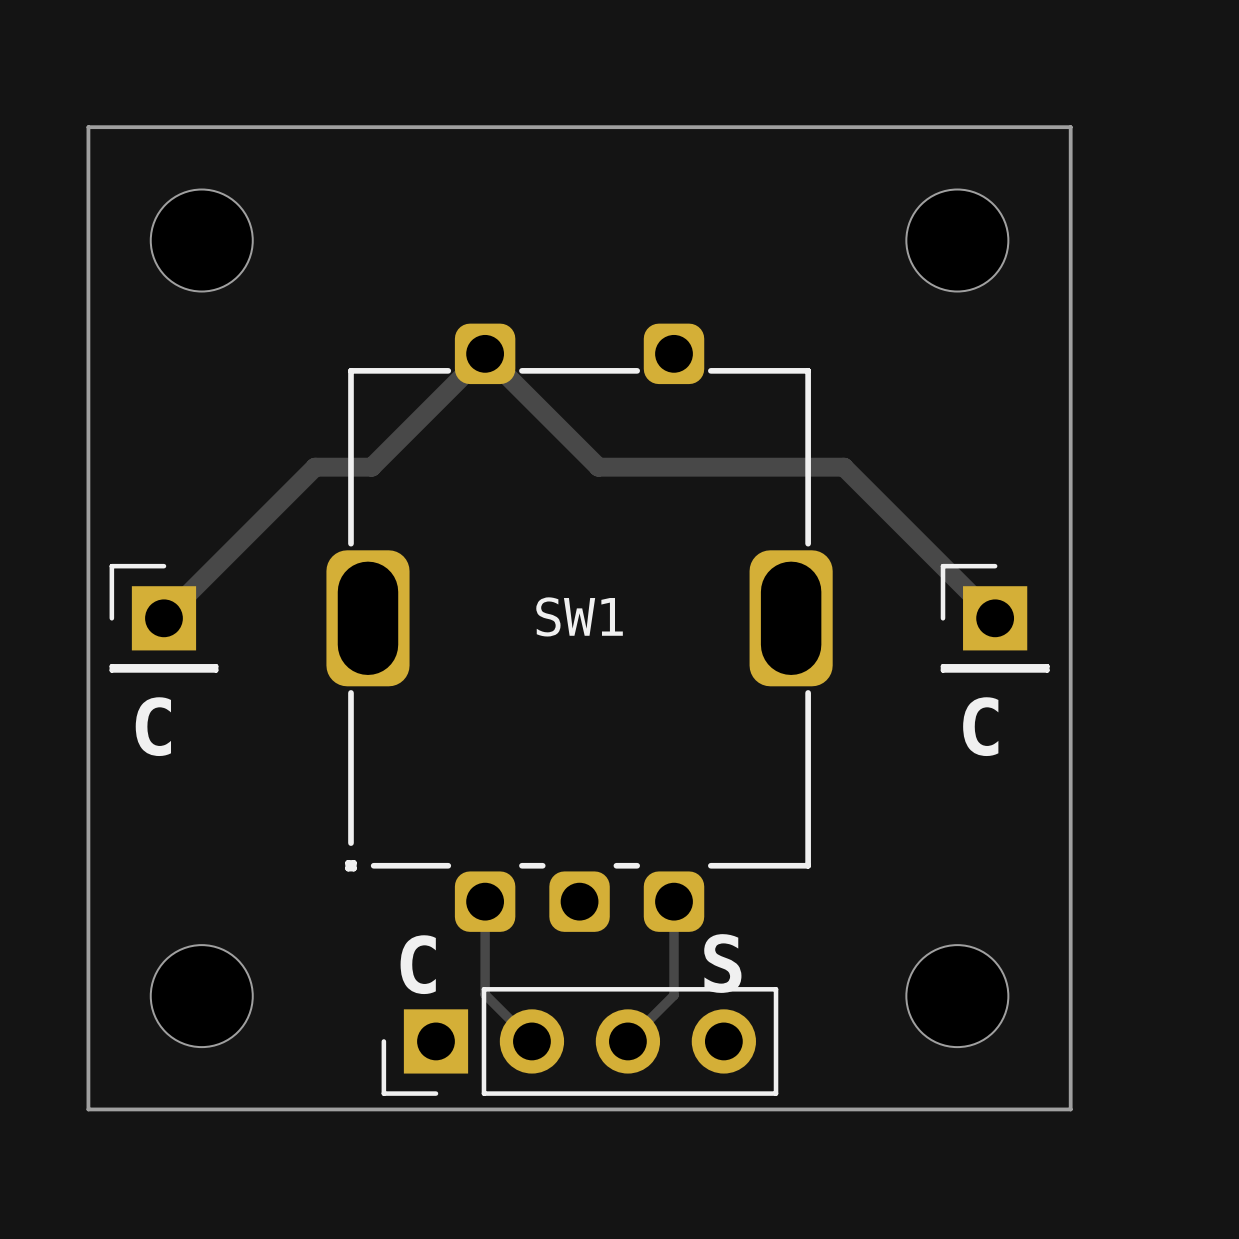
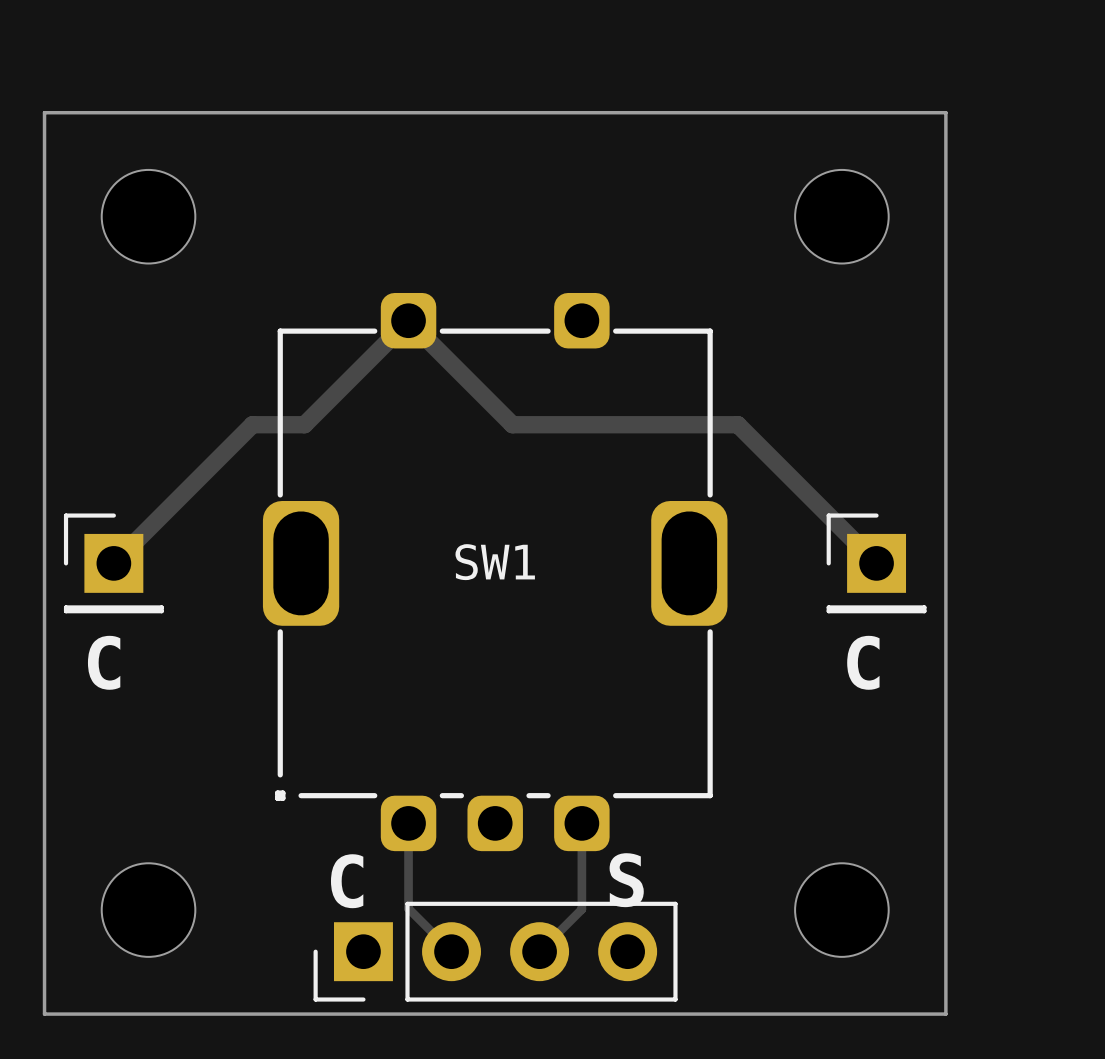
SW1 footprint: [326, 323, 833, 932] -> [262, 292, 728, 852]

